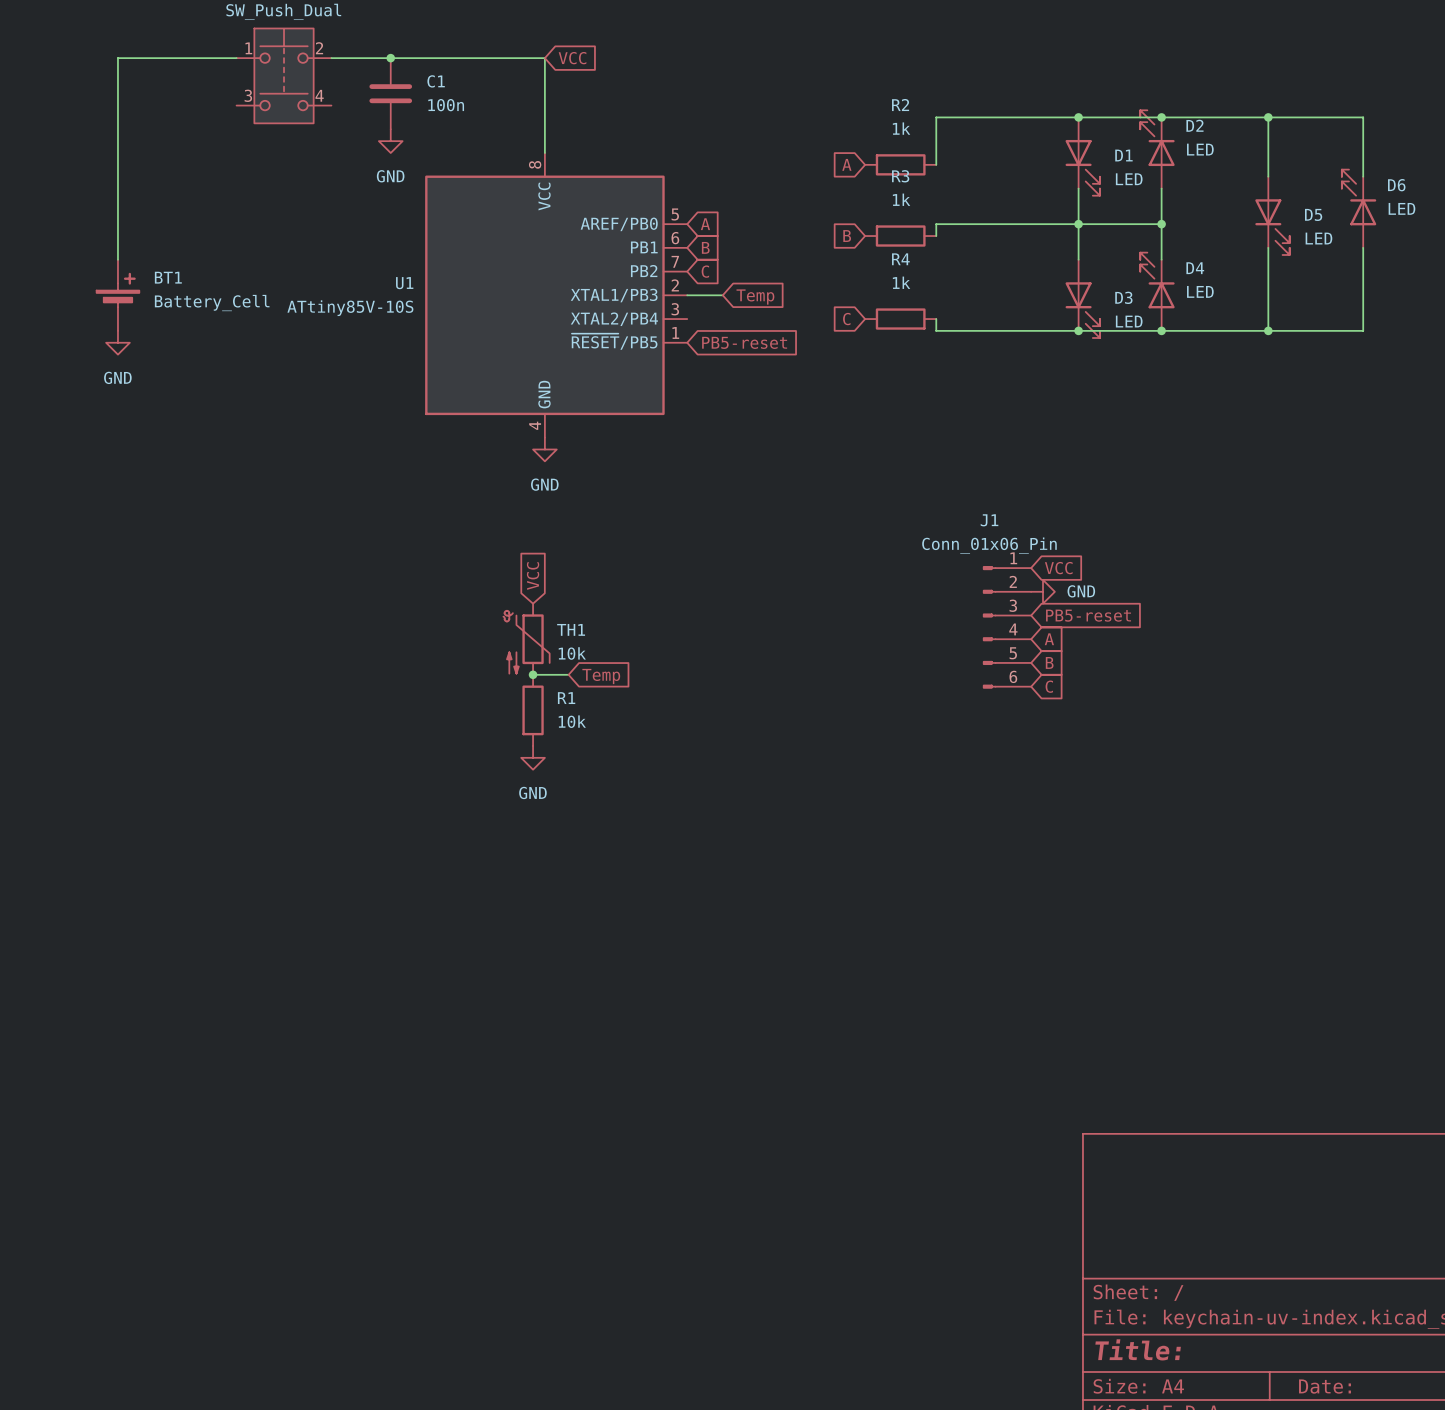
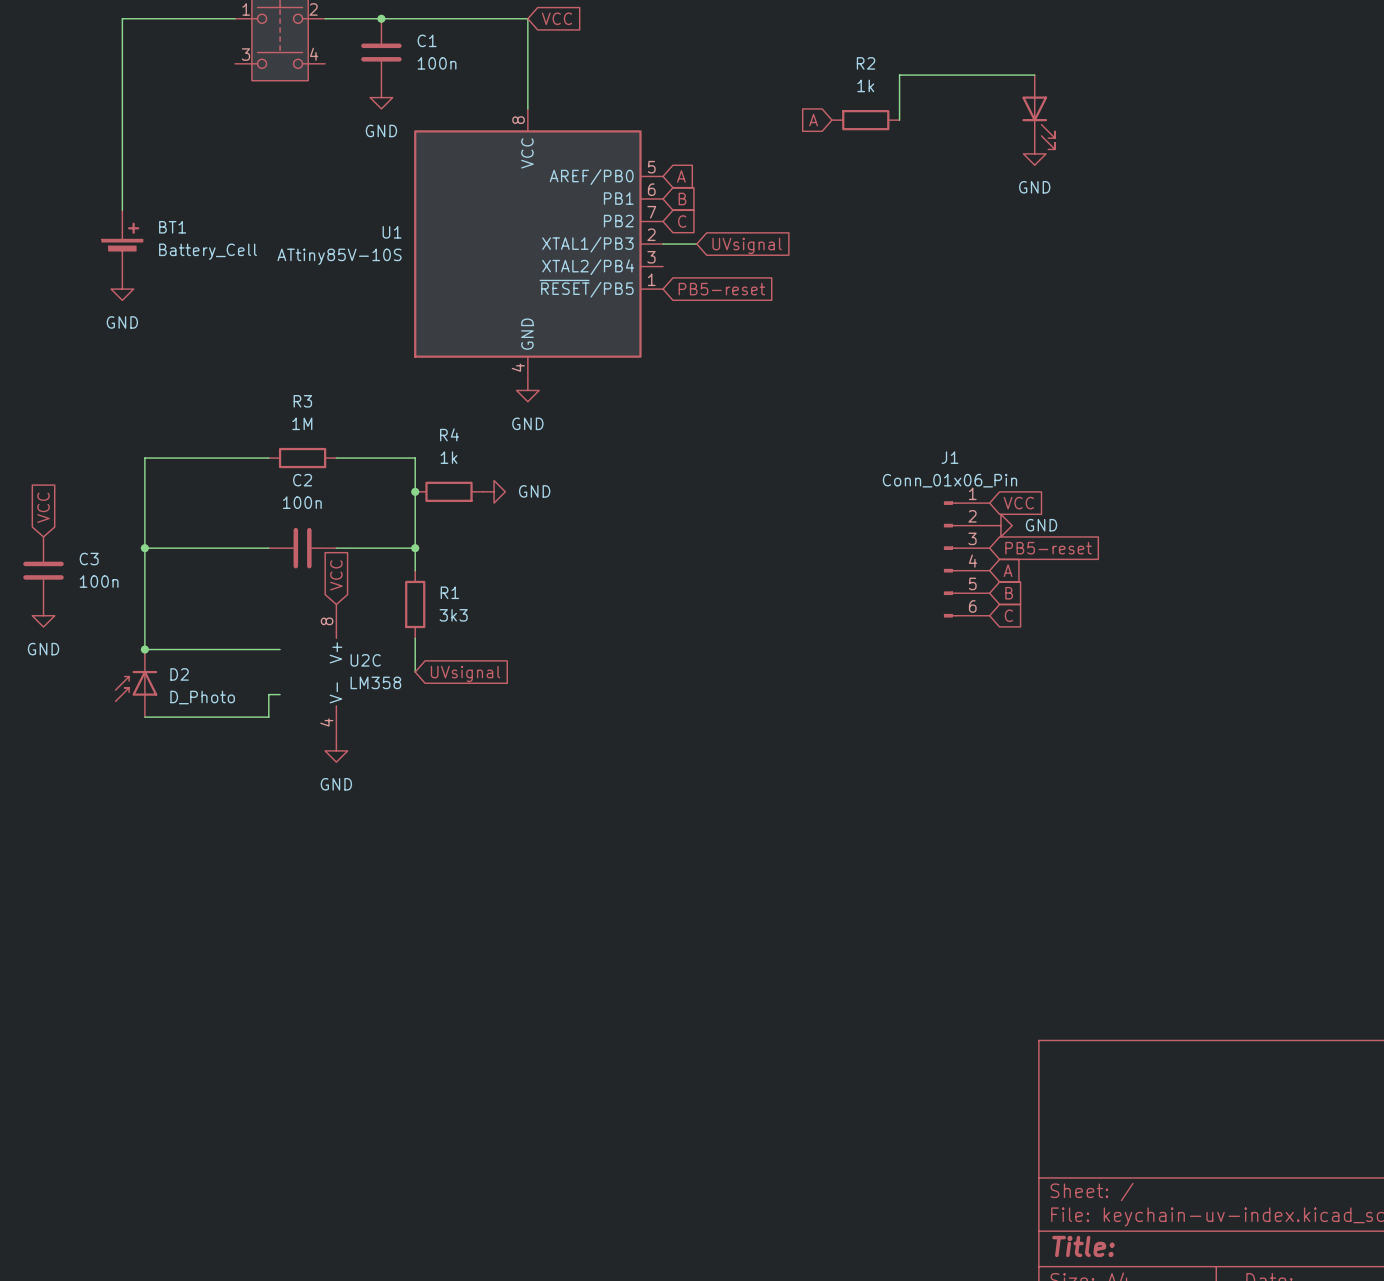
D2 symbol: [1140, 110, 1175, 189] -> [115, 649, 158, 718]
wire: (1078, 117) (1363, 117) (1363, 176) -> none
junction: (1078, 117) -> none
junction: (1161, 117) -> none
wire: (1268, 117) (1268, 176) -> none
junction: (1268, 117) -> none
D2 value: LED (1200, 149) -> D_Photo (202, 697)
D1 name: D1 (1123, 155) -> none
D1 value: LED (1129, 179) -> none
wire: (1078, 188) (1078, 259) -> none
wire: (1161, 188) (1161, 259) -> none
R3 value: 1k (901, 199) -> 1M (302, 423)
power symbol: none -> GND (1034, 153)
D6: LED (1359, 208) -> none
D5: LED (1272, 215) -> none
junction: (1078, 224) -> none
wire: (1161, 224) (936, 224) (936, 236) -> none
junction: (1161, 224) -> none
global label: B (847, 236) -> none
R3 position: (900, 236) -> (302, 458)
wire: (1268, 247) (1268, 330) -> none
wire: (1363, 247) (1363, 330) (936, 330) (936, 319) -> none
D4: LED (1157, 291) -> none
global label: Temp (755, 297) -> UVsignal (747, 245)
D3: LED (1082, 298) -> none
global label: C (846, 319) -> none
R4 position: (900, 319) -> (449, 491)
junction: (1078, 330) -> none
junction: (1161, 330) -> none
junction: (1268, 330) -> none
wire: none -> (268, 458) (144, 458) (144, 649) (280, 649)
wire: none -> (336, 458) (415, 458) (415, 570)
junction: none -> (415, 491)
power symbol: none -> GND (494, 491)
global label: none -> VCC (43, 507)
global label position: VCC (533, 576) -> VCC (336, 575)
wire: none -> (144, 548) (268, 548)
junction: none -> (144, 548)
C2: none -> 100n (302, 548)
wire: none -> (336, 548) (415, 548)
junction: none -> (415, 548)
C3: none -> 100n (43, 570)
TH1: 10k (526, 639) -> none
wire: (533, 674) (568, 674) -> none
junction: (533, 674) -> none
global label: Temp (601, 676) -> none
power symbol: none -> GND (43, 615)
wire: none -> (415, 638) (415, 672)
R1 position: (533, 710) -> (415, 604)
R1 value: 10k (572, 721) -> 3k3 (453, 615)
junction: none -> (144, 649)
U2C: none -> LM358 (336, 672)
global label: none -> UVsignal (465, 673)
power symbol: GND (533, 757) -> none
wire: none -> (280, 694) (268, 694) (268, 717) (144, 717)
power symbol: none -> GND (336, 750)

